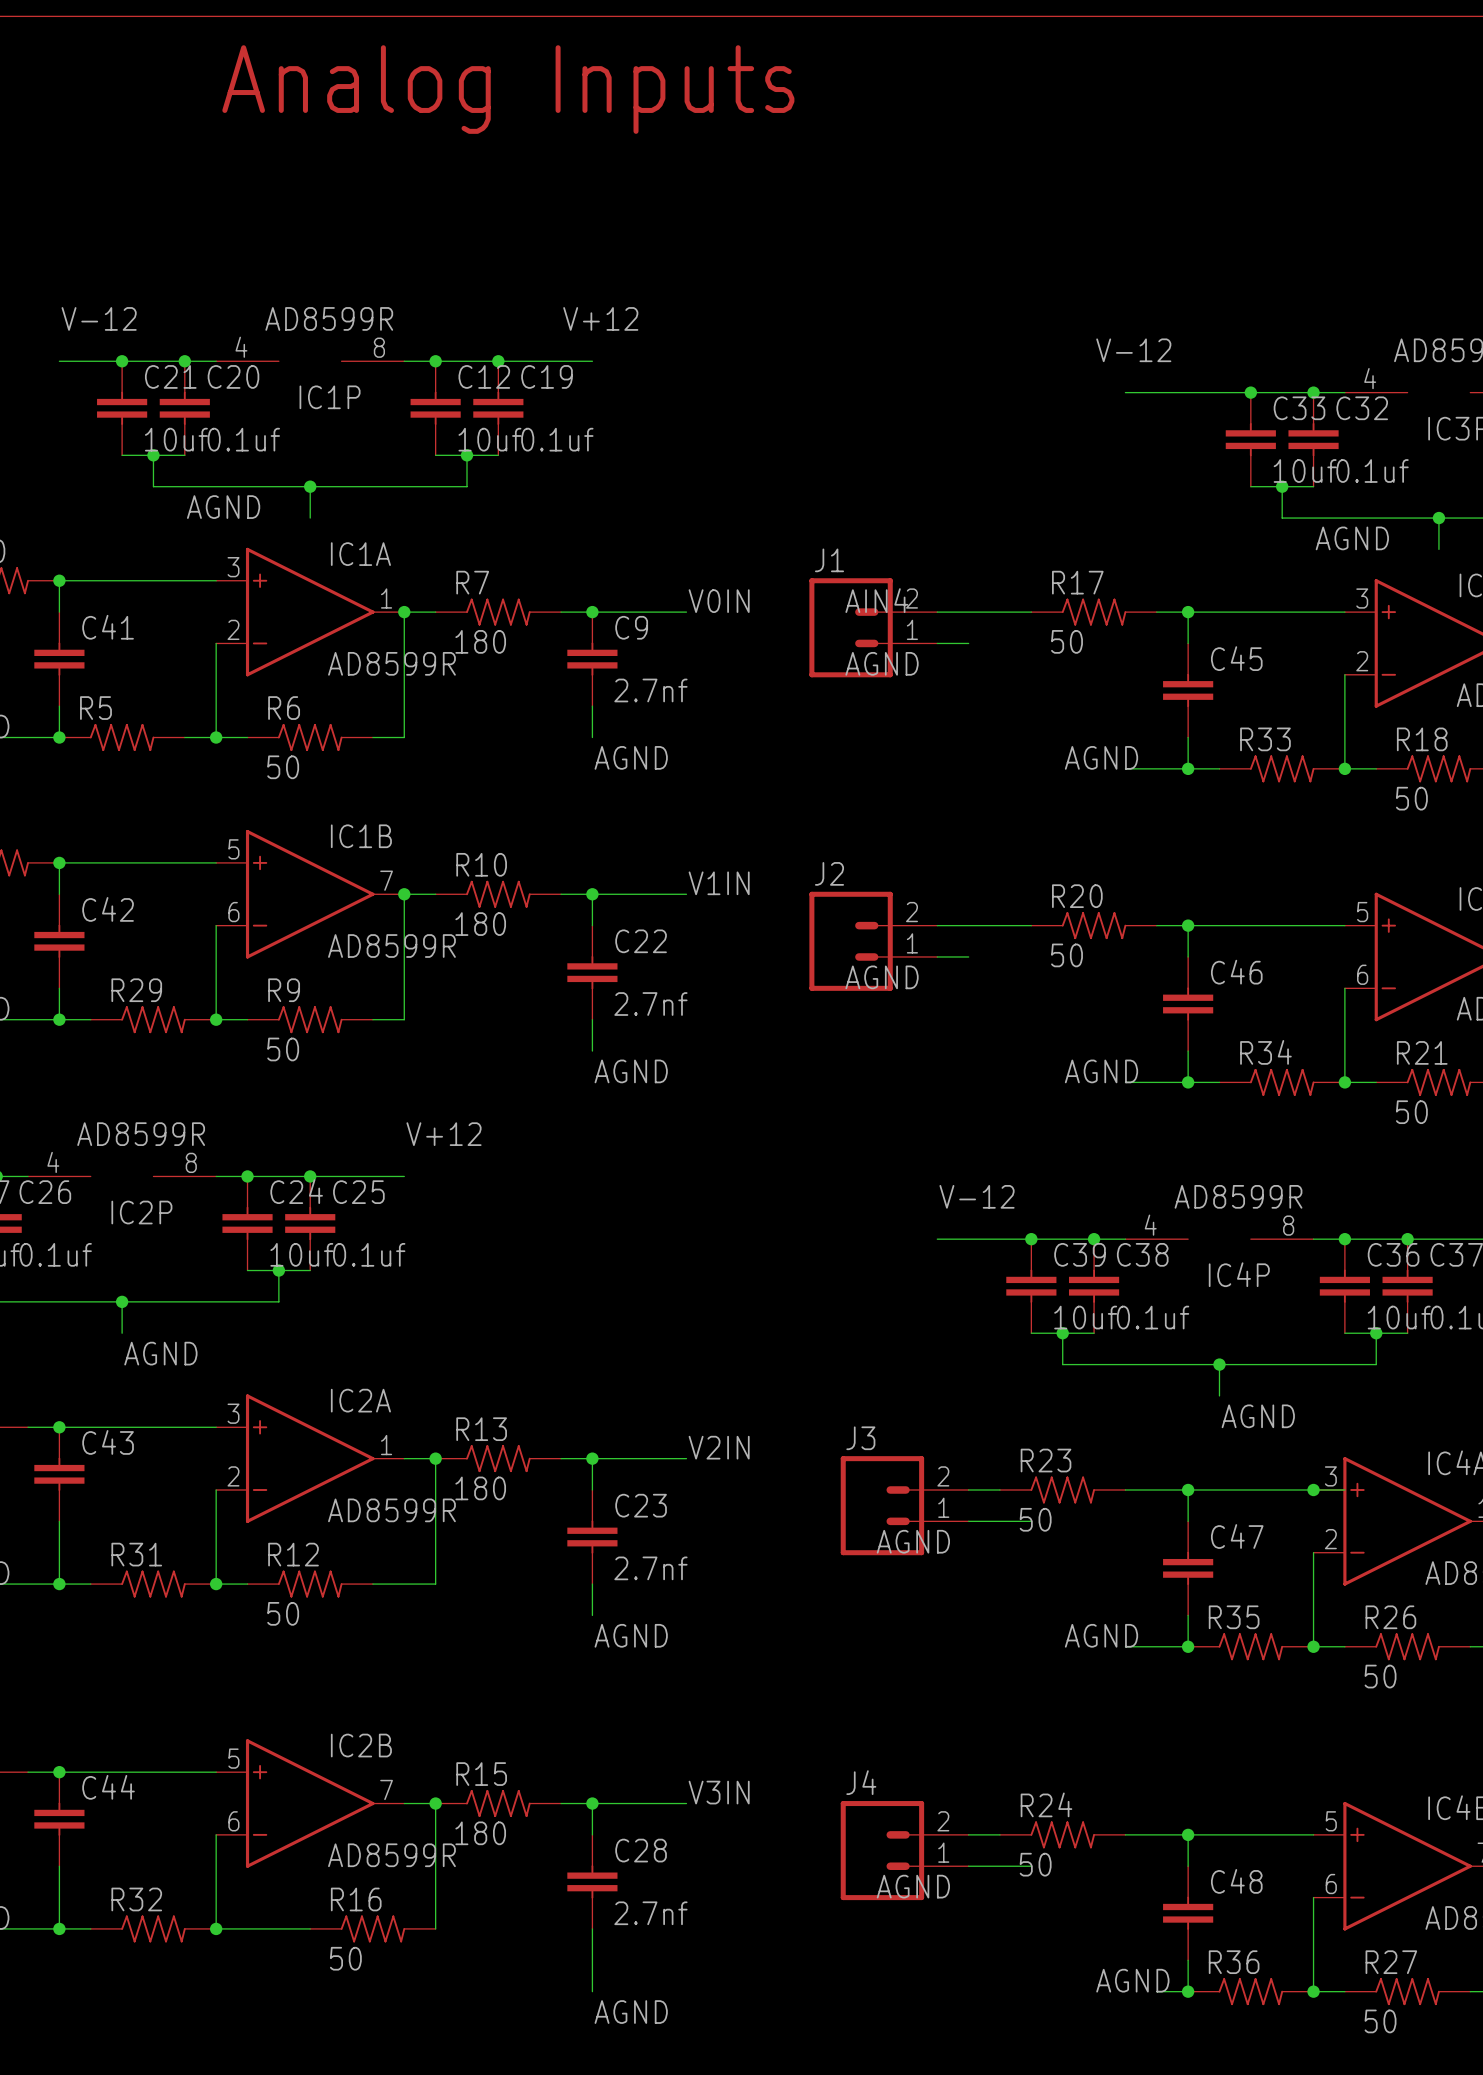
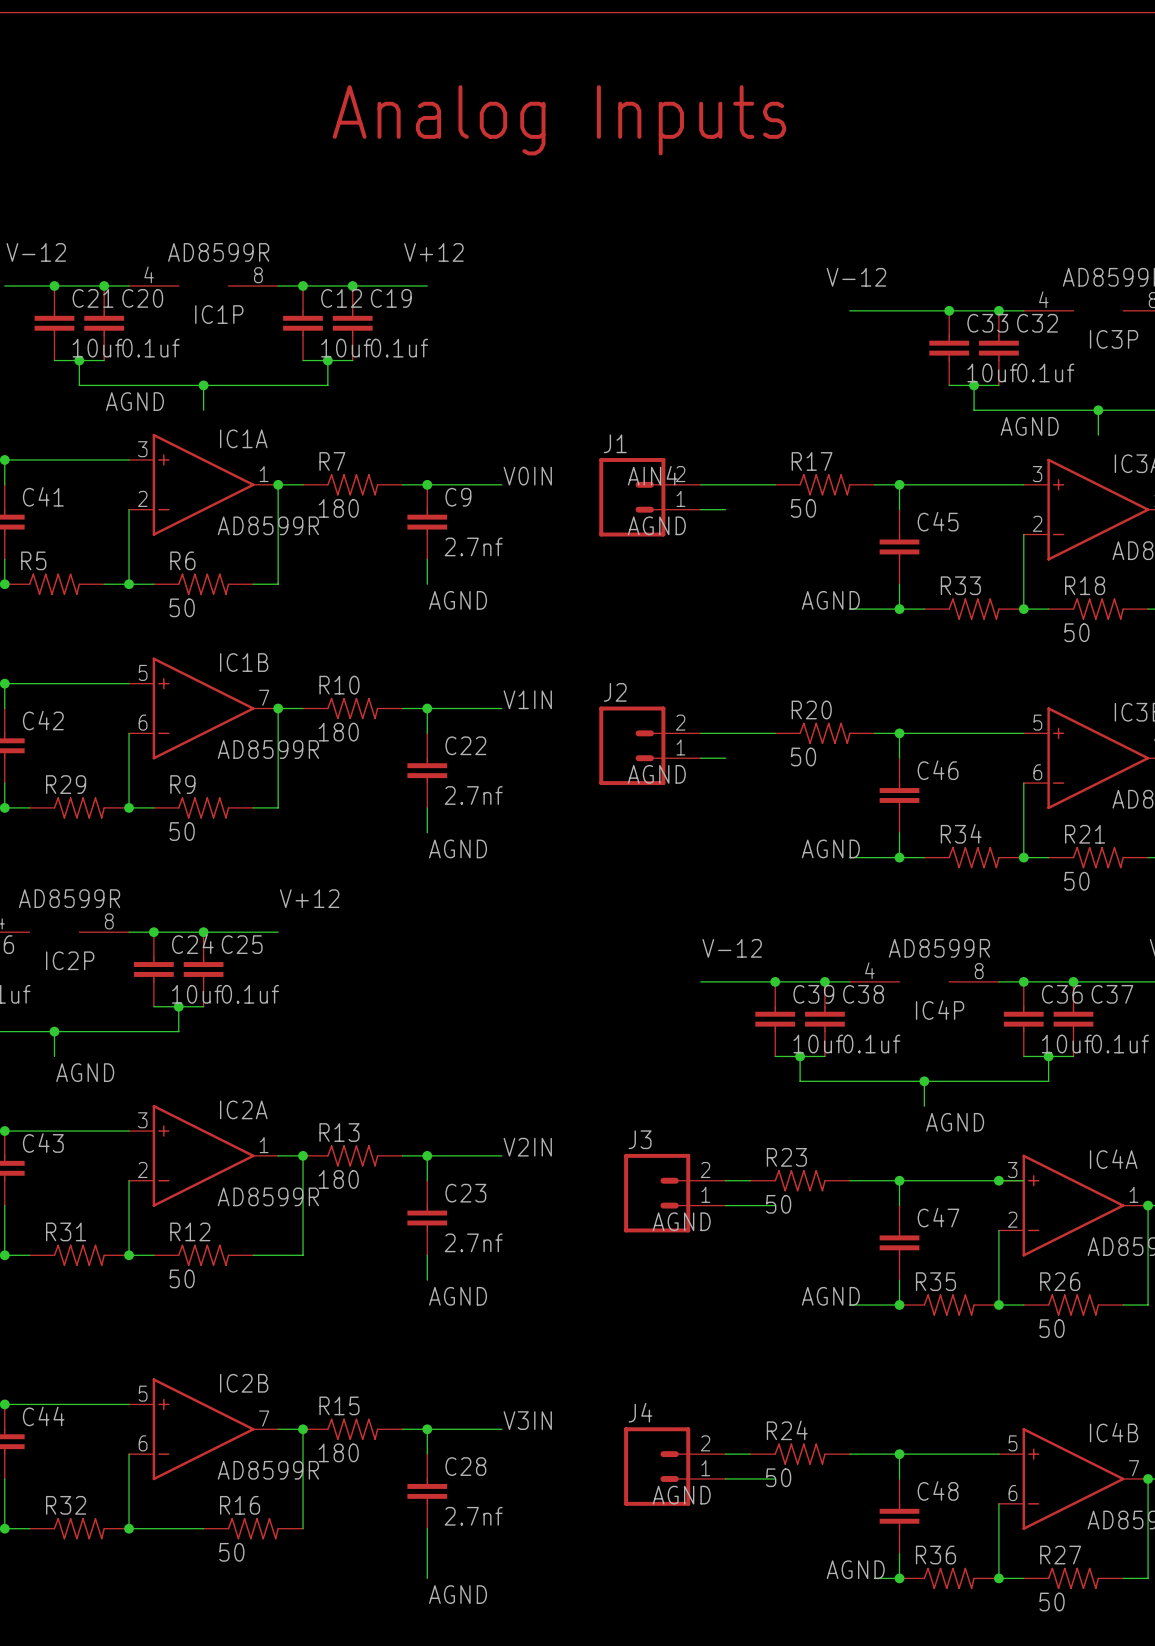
text position: Analog Inputs (508, 89) -> Analog Inputs (559, 120)

